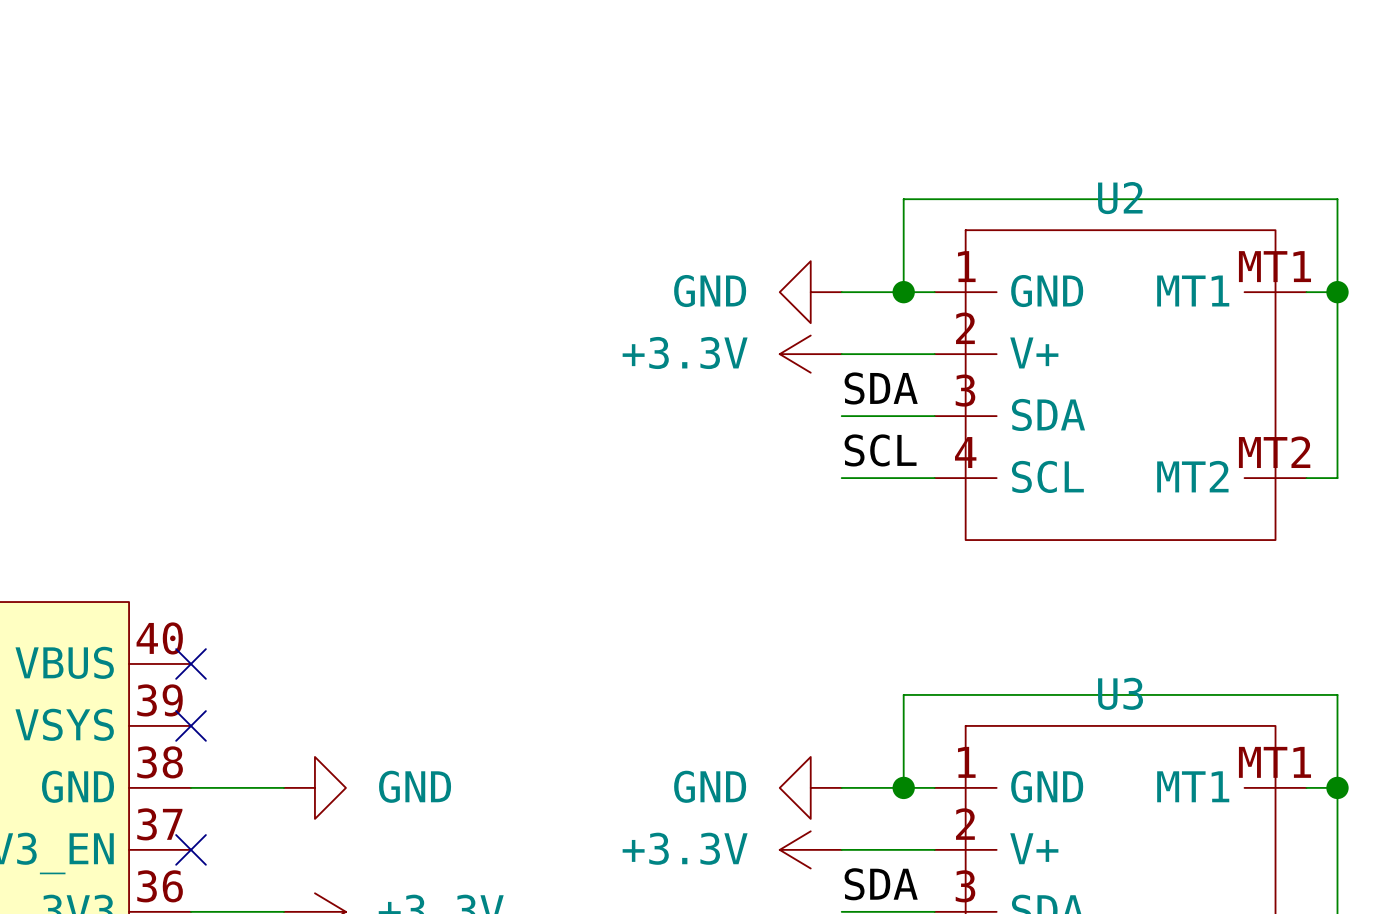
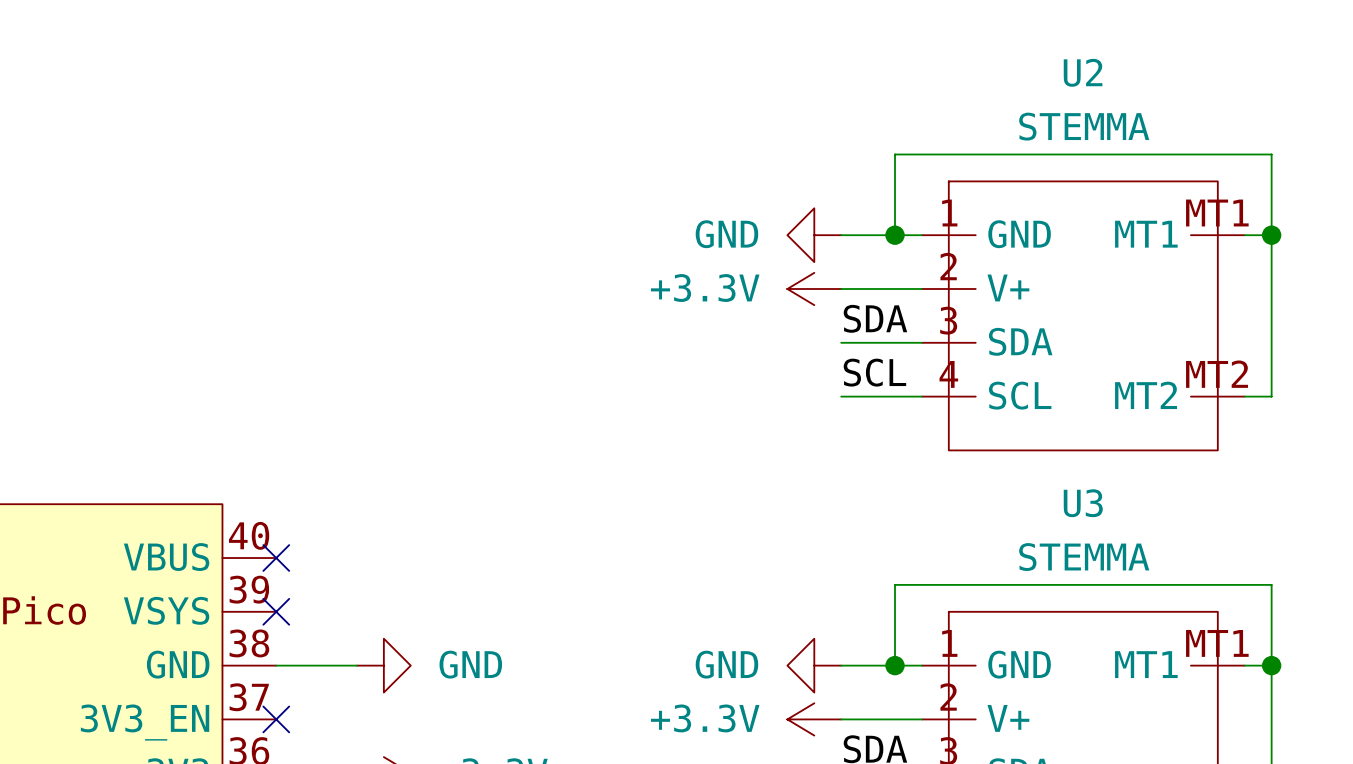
U2 value: none -> STEMMA (1084, 126)
U2 name position: U2 (1120, 198) -> U2 (1083, 72)
U3 value: none -> STEMMA (1084, 557)
U3 name position: U3 (1120, 693) -> U3 (1083, 503)

